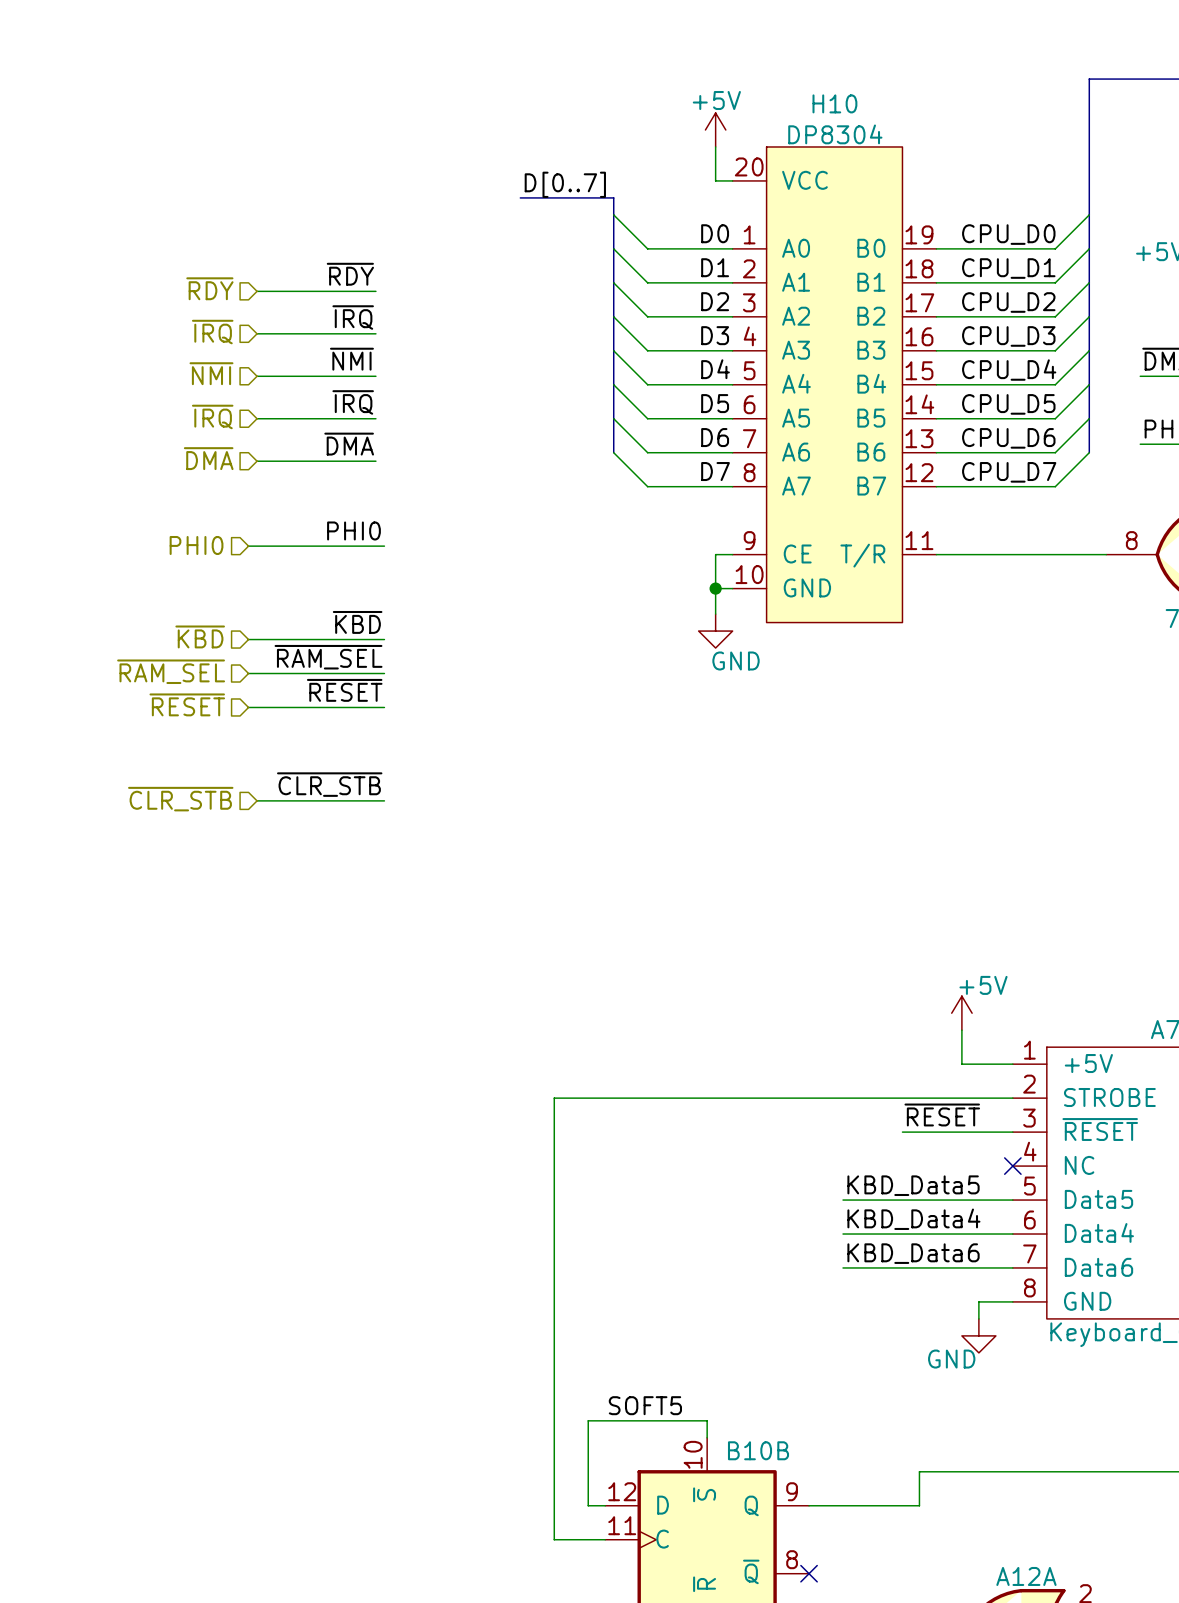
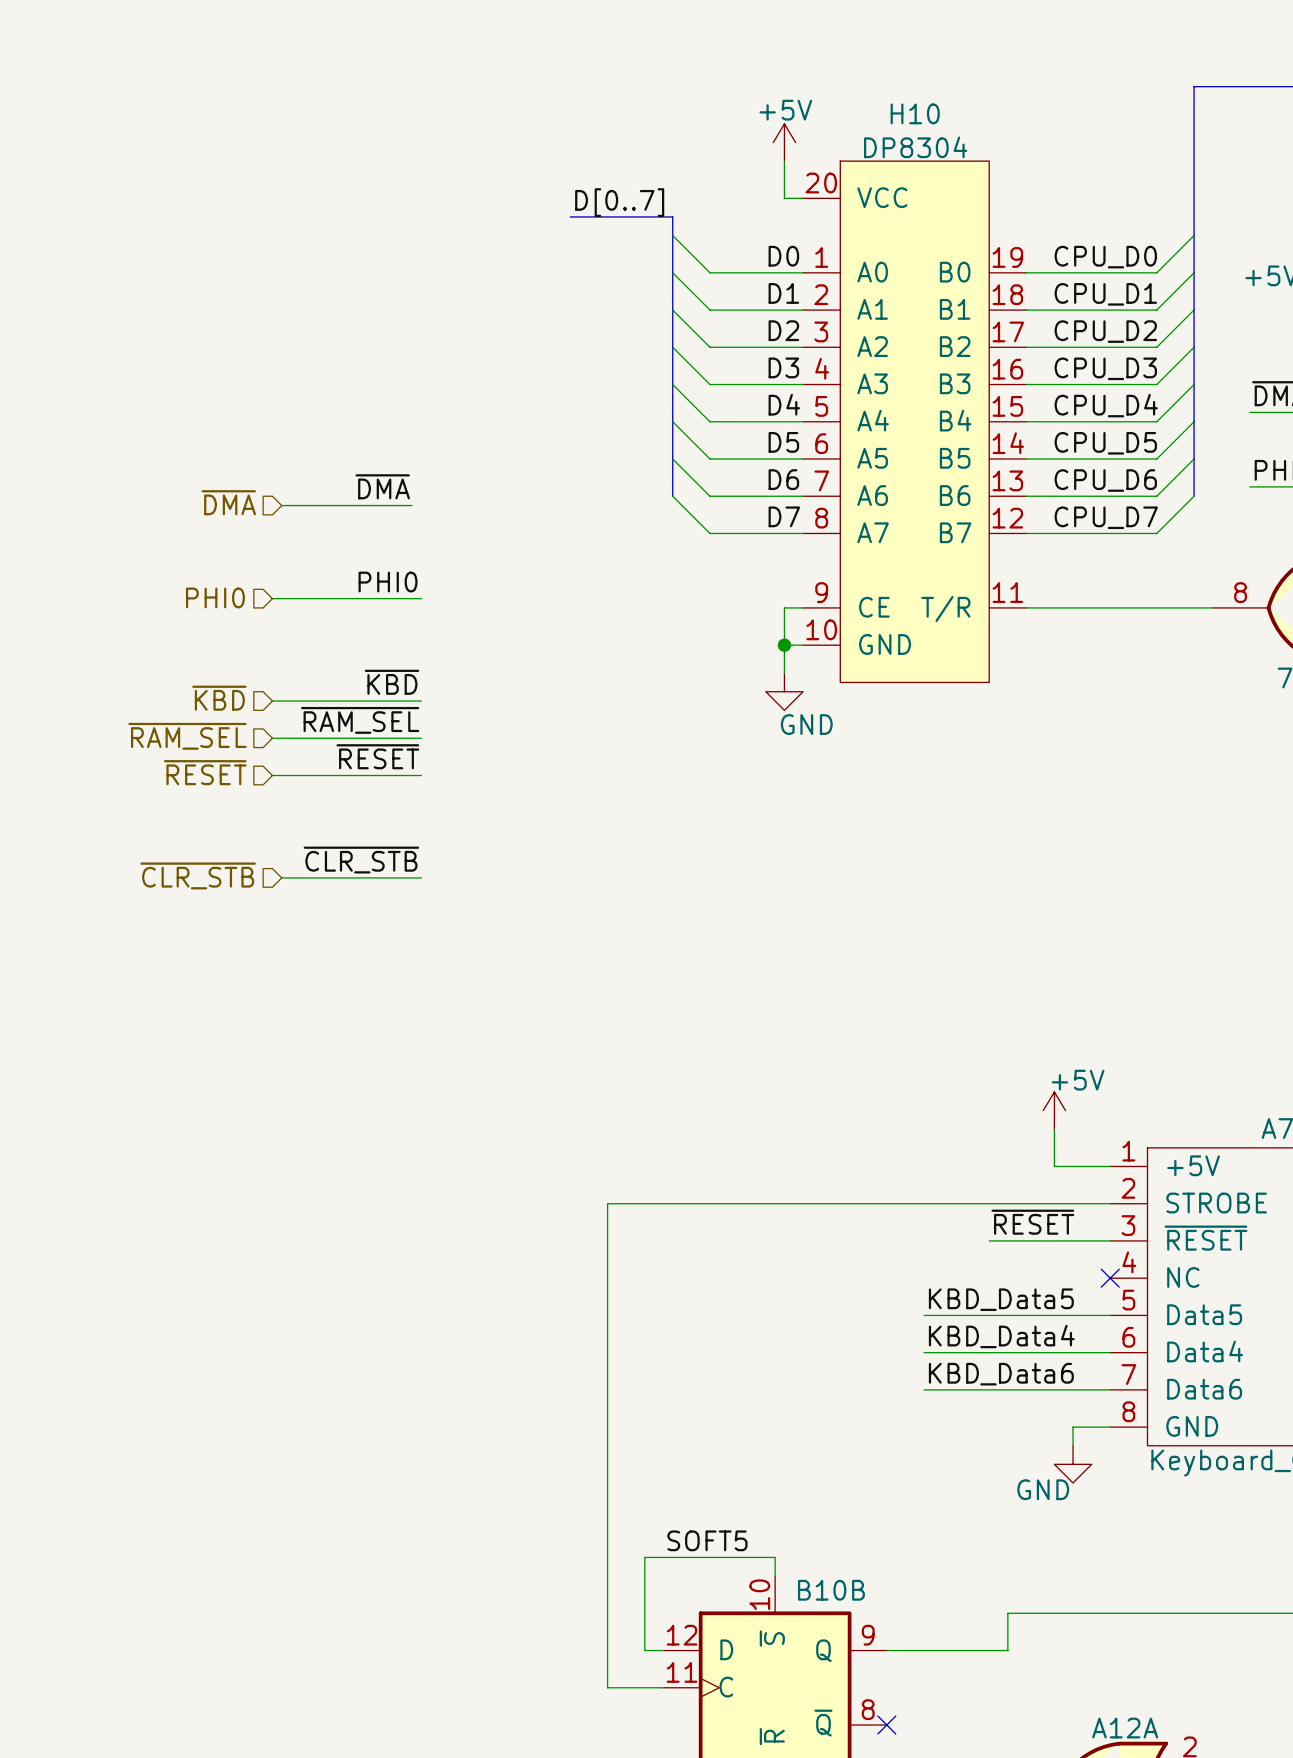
label: ~{RDY} (350, 274) -> none
hierarchical label: ~{RDY} (209, 288) -> none
wire: (257, 291) (375, 291) -> none
label: ~{IRQ} (353, 317) -> none
hierarchical label: ~{IRQ} (212, 332) -> none
wire: (257, 333) (375, 333) -> none
label: ~{NMI} (351, 359) -> none
hierarchical label: ~{NMI} (211, 373) -> none
wire: (257, 376) (375, 376) -> none
label: ~{IRQ} (353, 402) -> none
hierarchical label: ~{IRQ} (212, 416) -> none
wire: (257, 418) (375, 418) -> none

